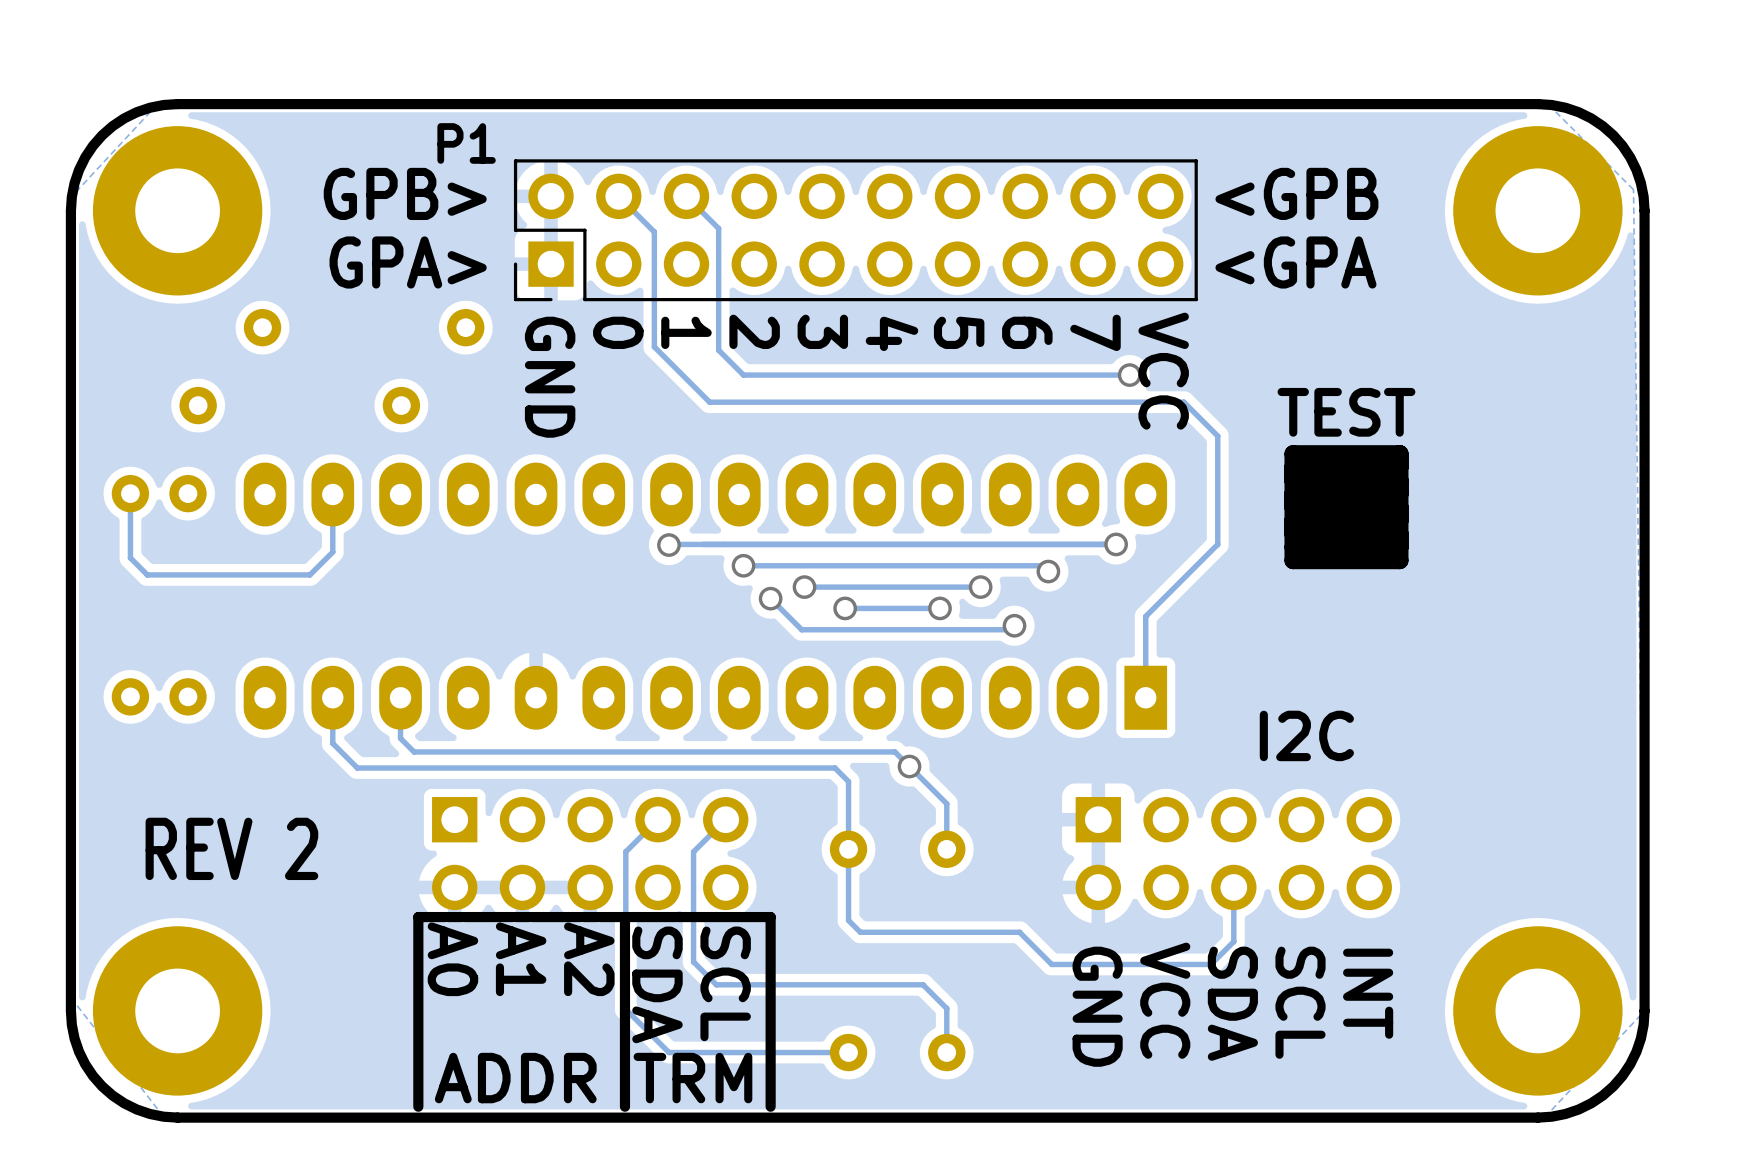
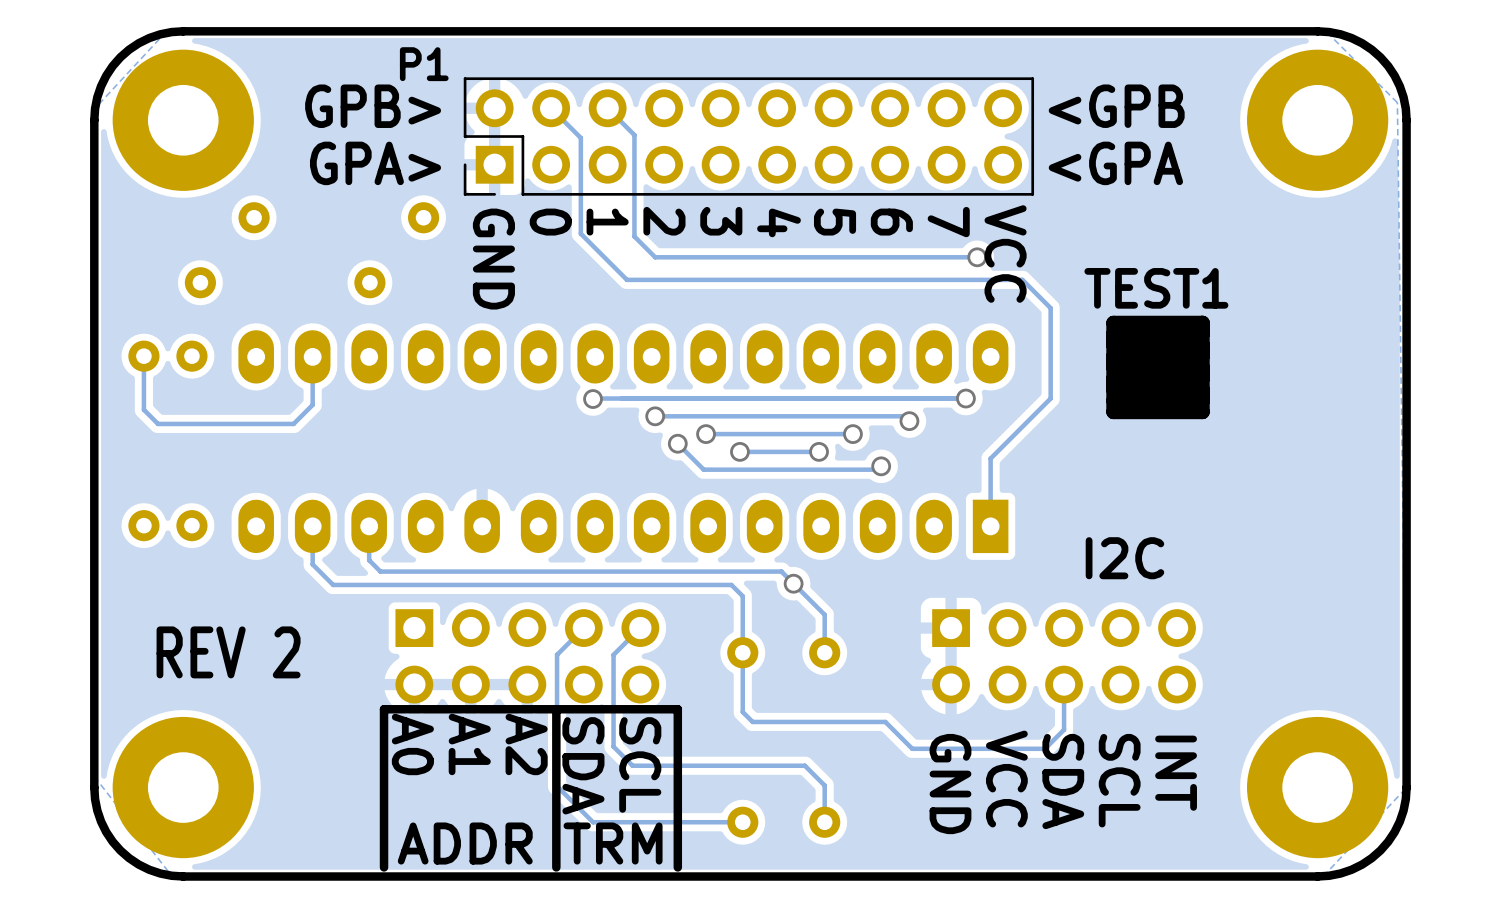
TEST name: TEST (1346, 412) -> TEST1 (1156, 288)

